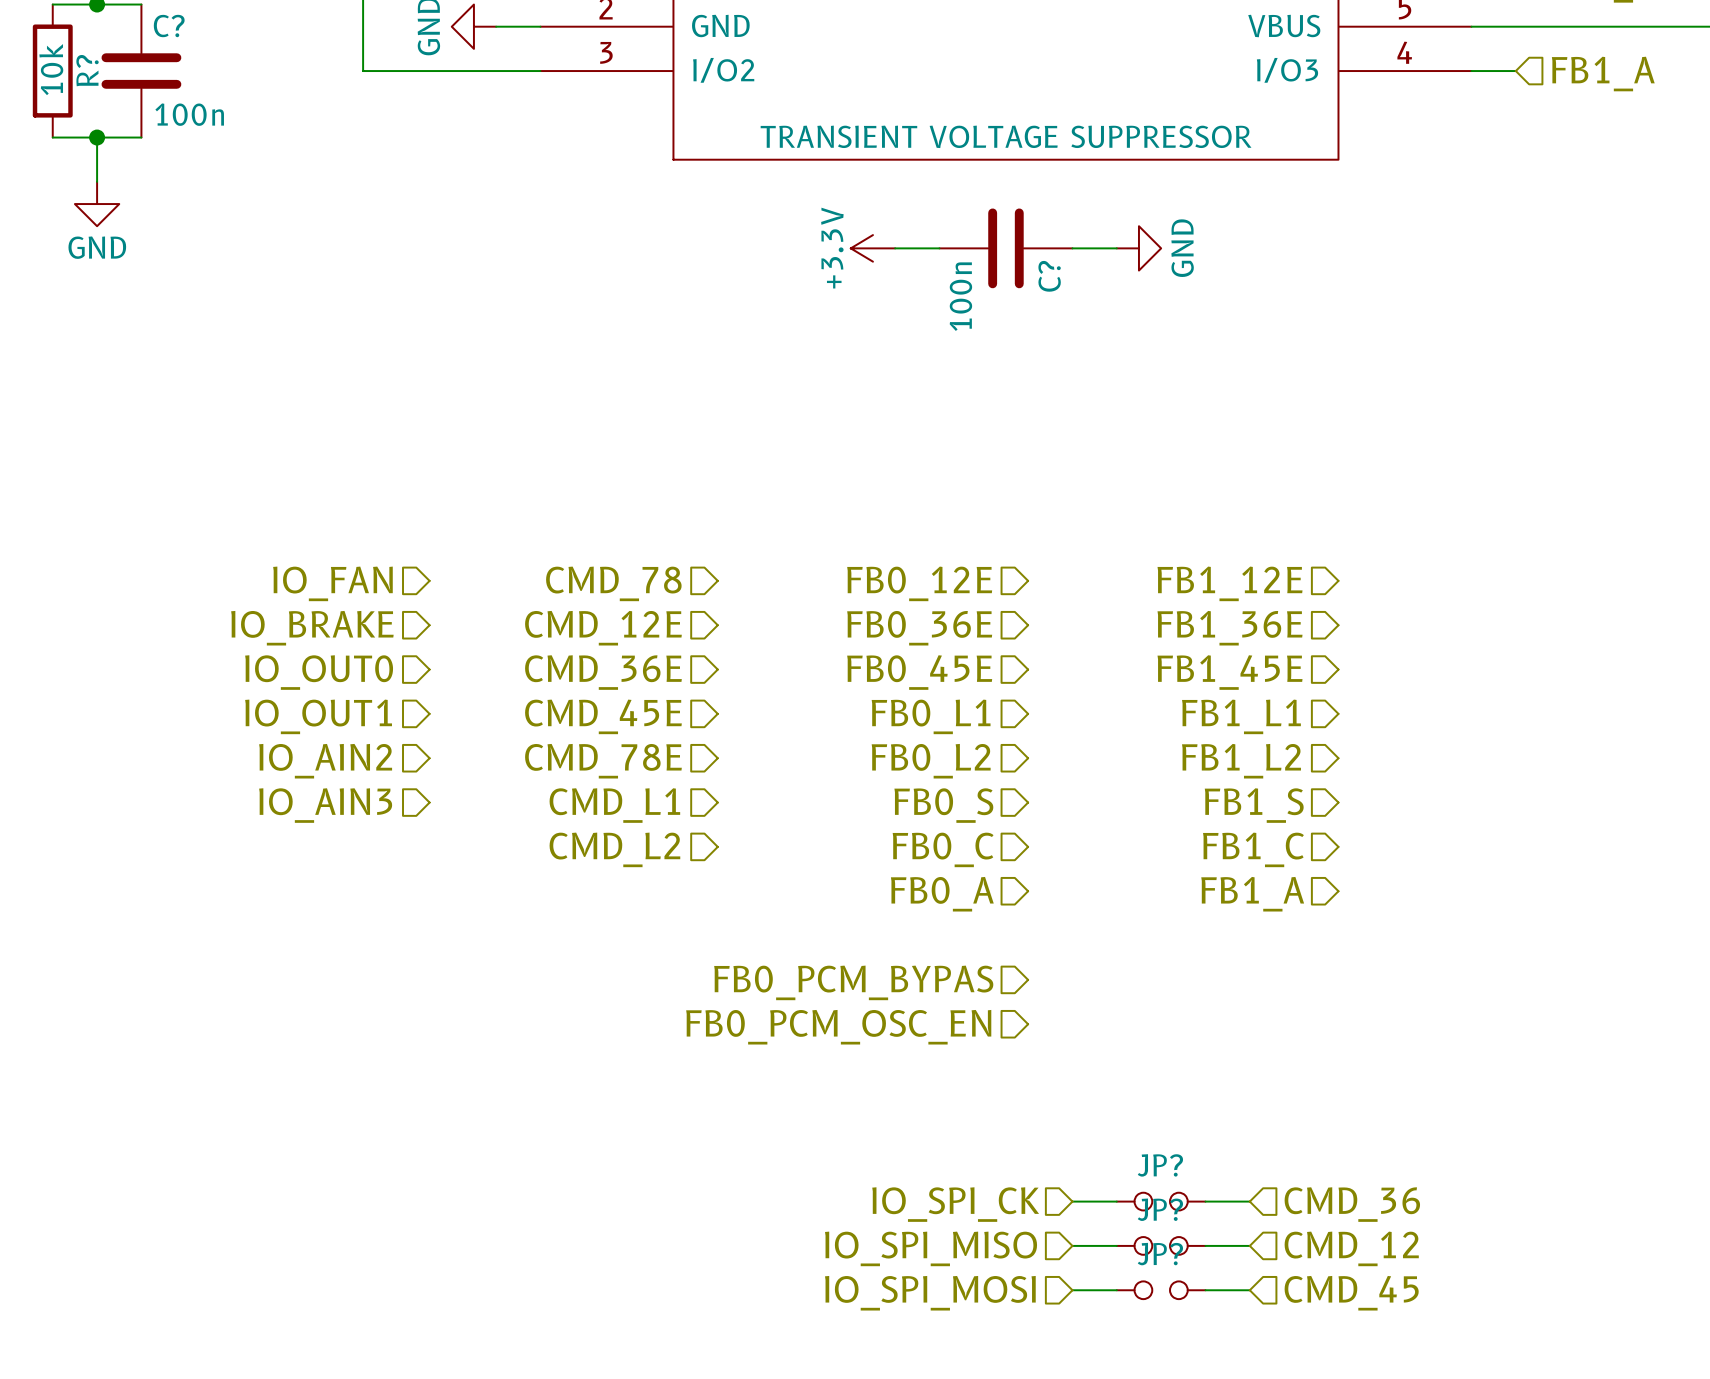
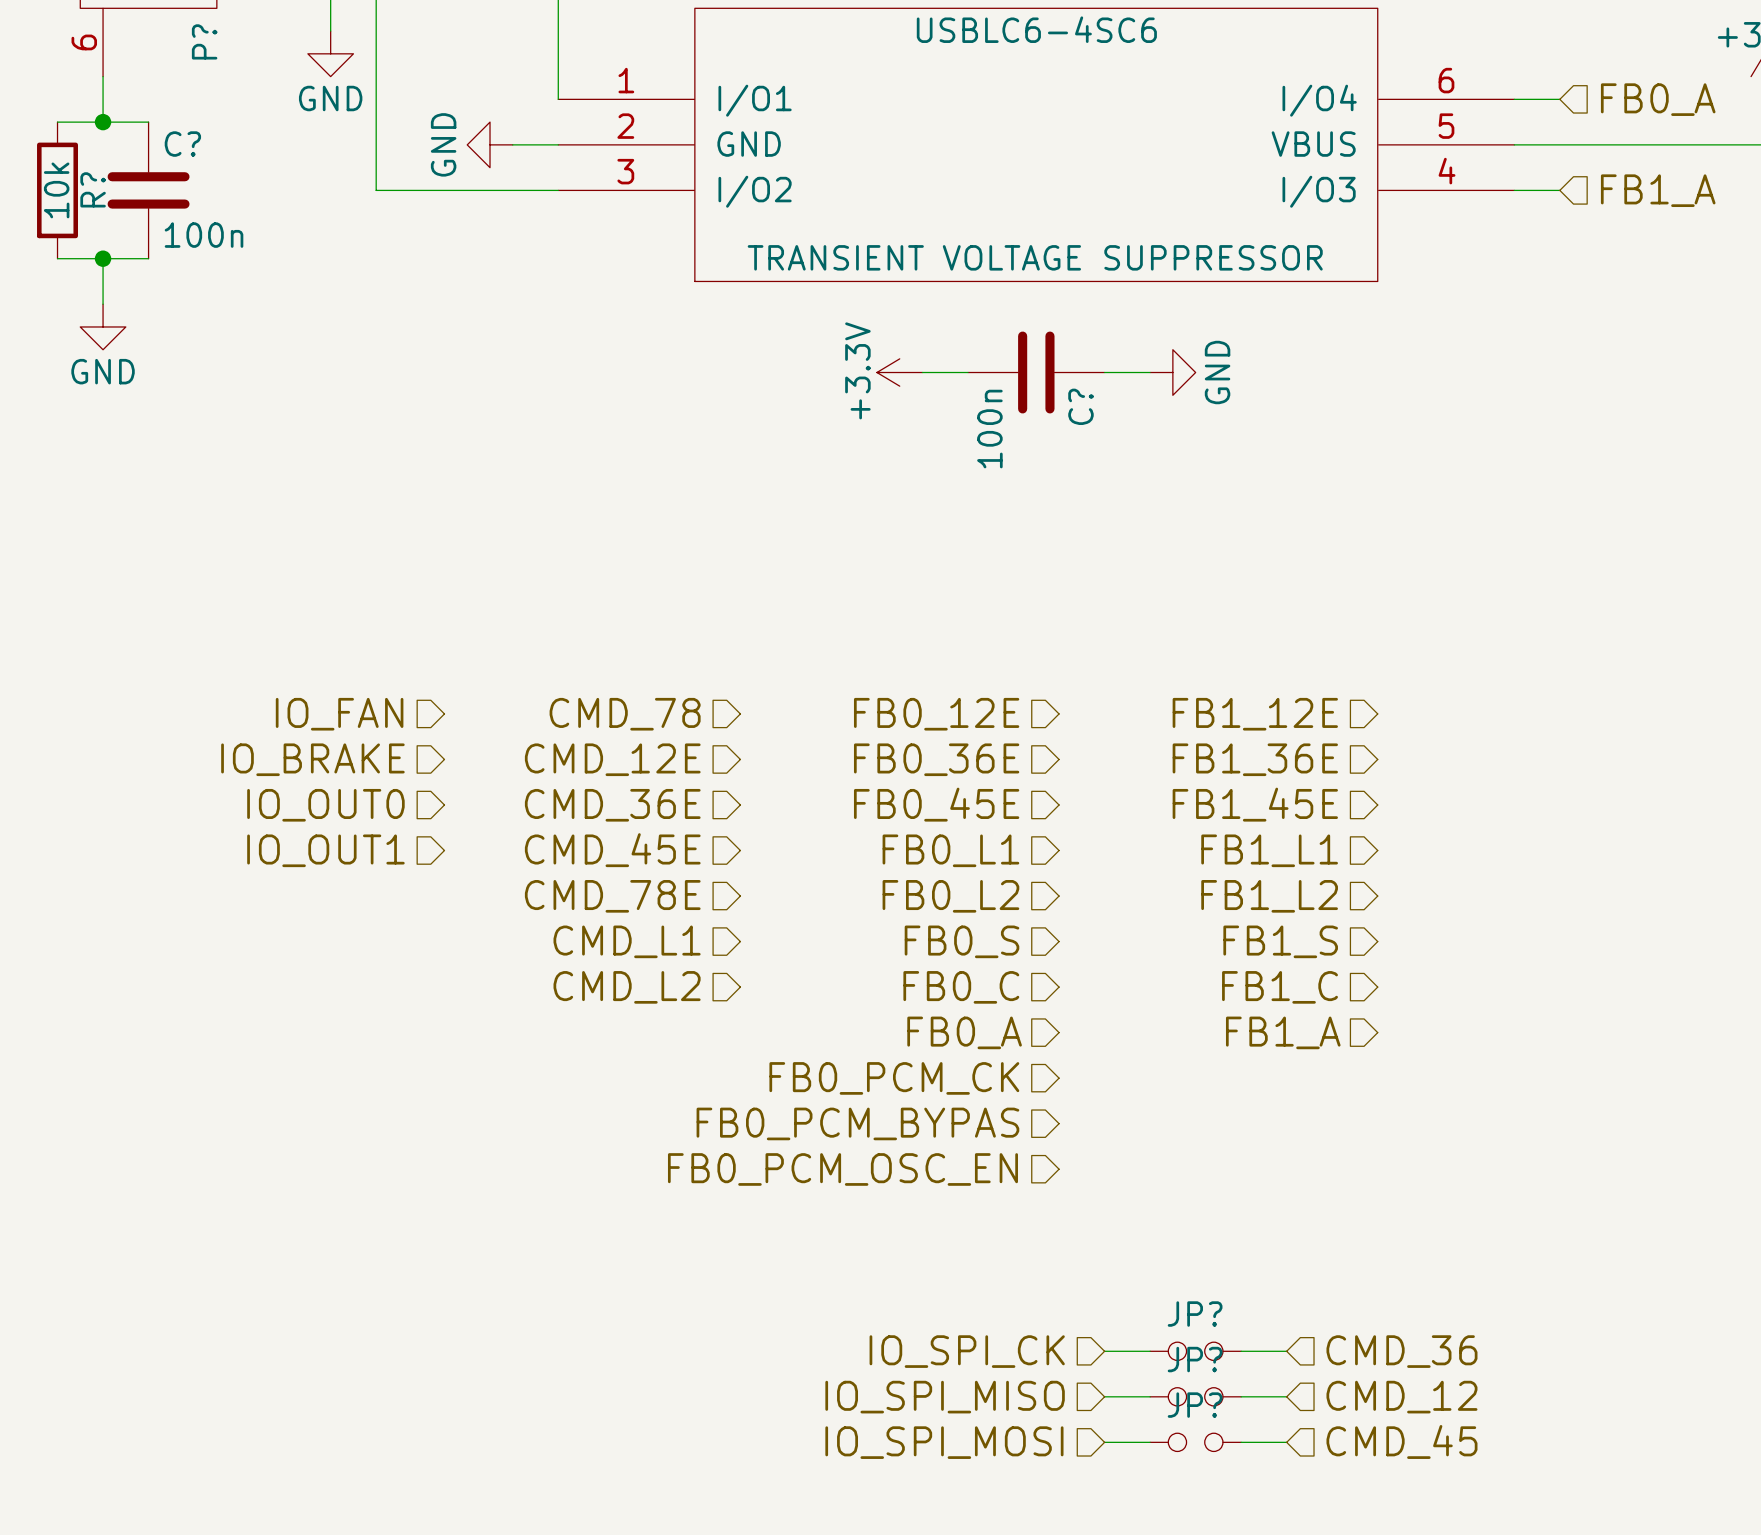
hierarchical label: IO_AIN2 (325, 761) -> none
hierarchical label: IO_AIN3 (325, 805) -> none
hierarchical label: none -> FB0_PCM_CK (894, 1078)

